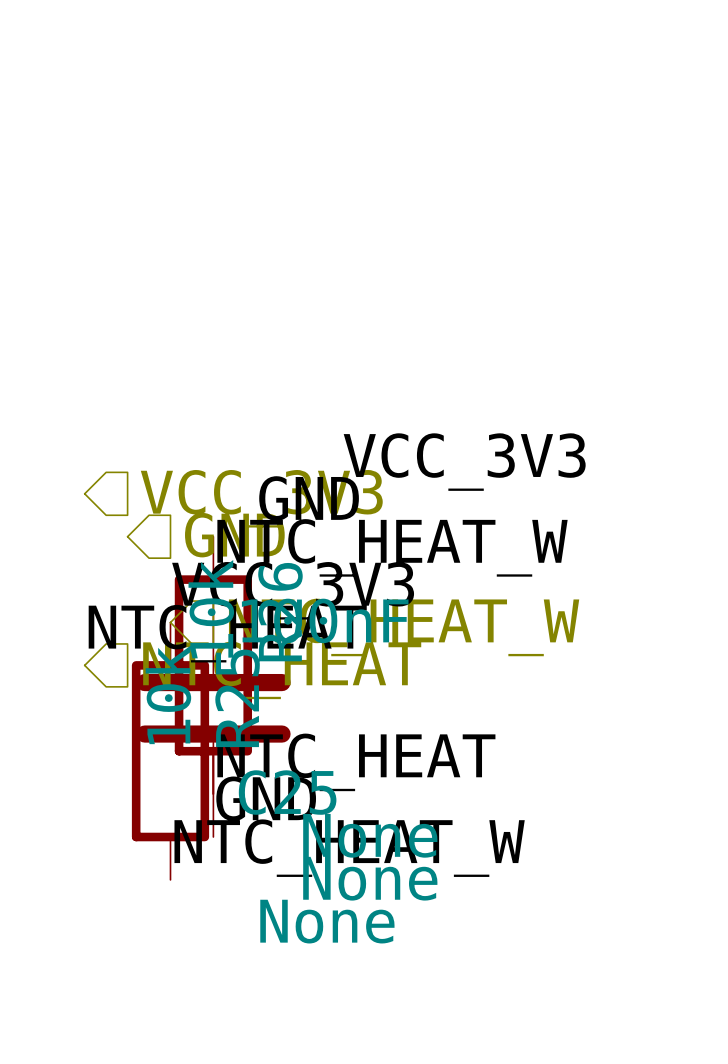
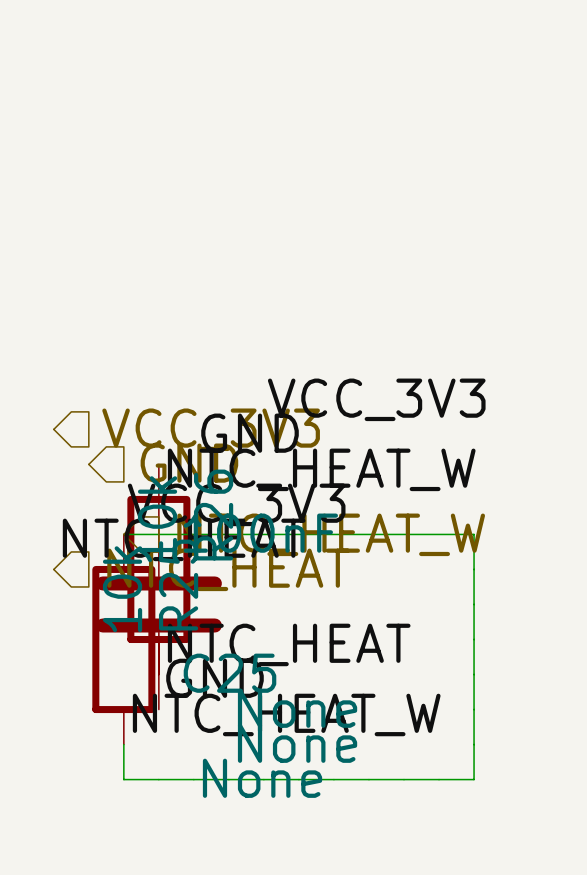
wire: none -> (123, 534) (474, 534) (474, 779) (123, 779) (123, 744)

